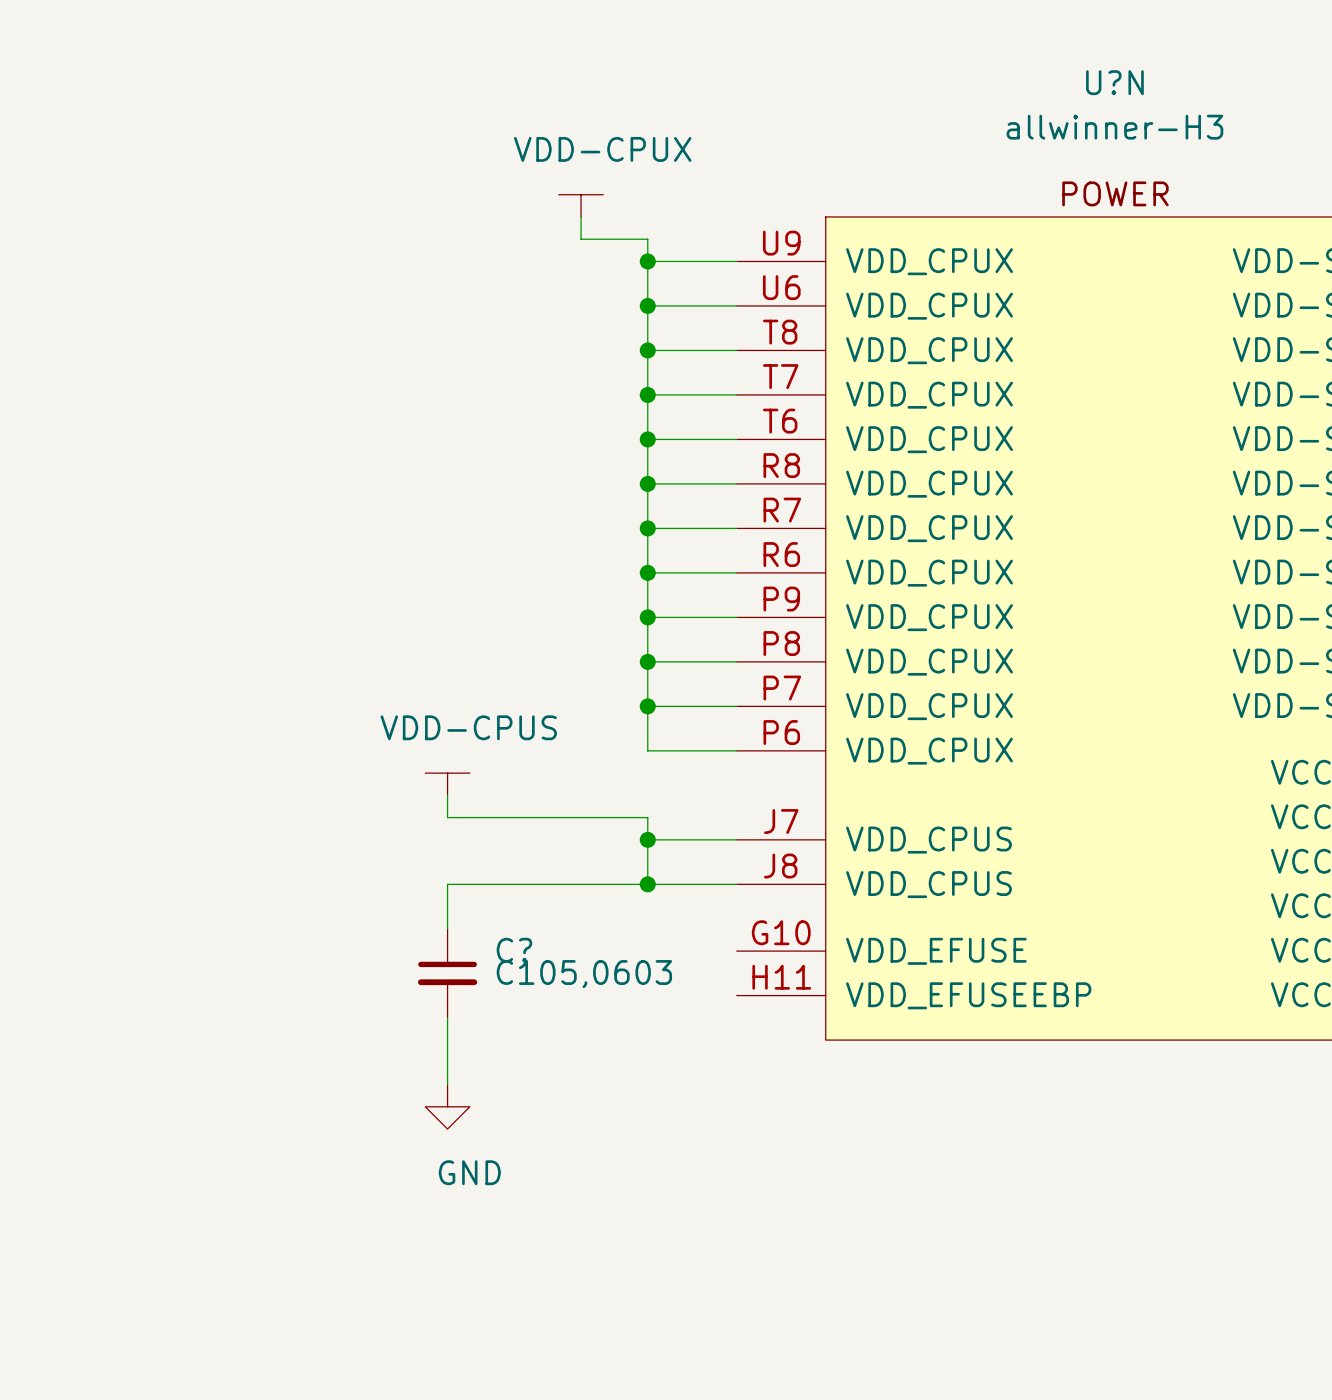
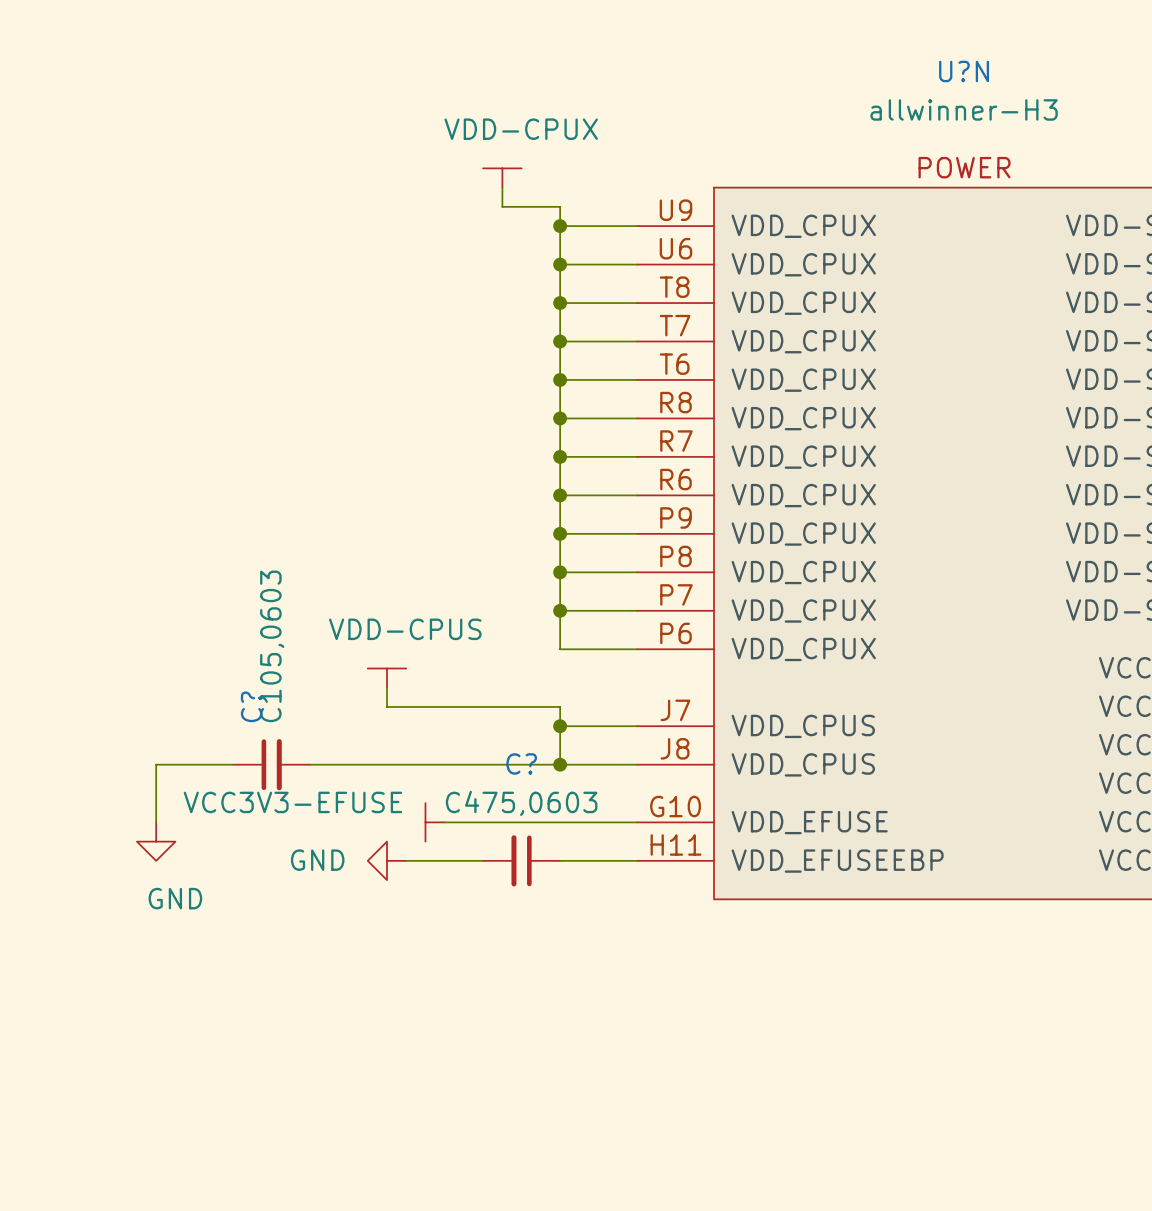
wire: none -> (233, 764) (156, 764) (156, 822)
wire: (447, 884) (447, 928) -> (386, 764) (310, 764)
power symbol: none -> VCC3V3-EFUSE (435, 822)
wire: none -> (444, 822) (637, 822)
power symbol: none -> GND (156, 841)
C? rotation: 0° (447, 973) -> 90° counterclockwise (271, 764)
C? position: (447, 973) -> (271, 764)
wire: none -> (406, 860) (483, 860)
C?: none -> C475,0603 (521, 860)
wire: none -> (560, 860) (637, 860)
wire: (447, 1017) (447, 1084) -> none
power symbol rotation: 0° (447, 1106) -> 90° clockwise (386, 860)
power symbol position: GND (447, 1106) -> GND (386, 860)

